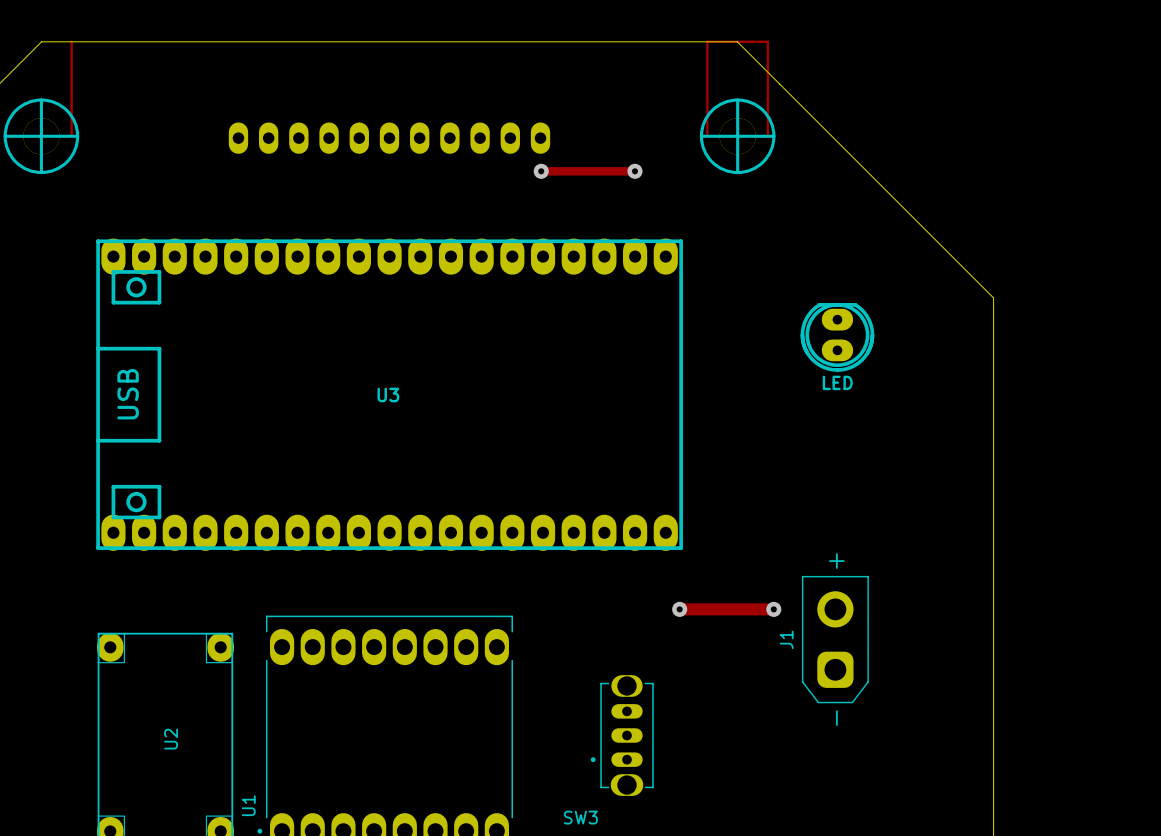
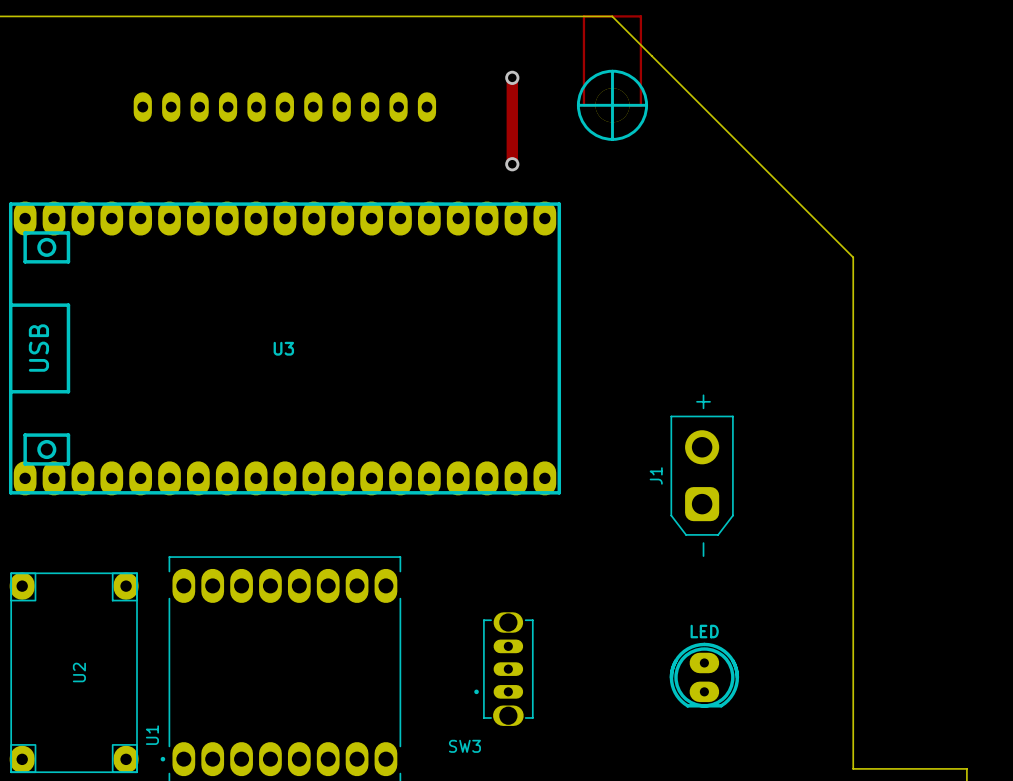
track: none -> (512, 77) (512, 164)
via: none -> (512, 77)
track: (541, 171) (634, 171) -> none
via: (541, 171) -> none
via: (634, 171) -> none
via: none -> (512, 164)
part: LED (837, 337) -> none
track: (679, 609) (774, 609) -> none
via: (679, 609) -> none
via: (773, 609) -> none
J1 position: (835, 639) -> (702, 475)
part: none -> LED (704, 675)

